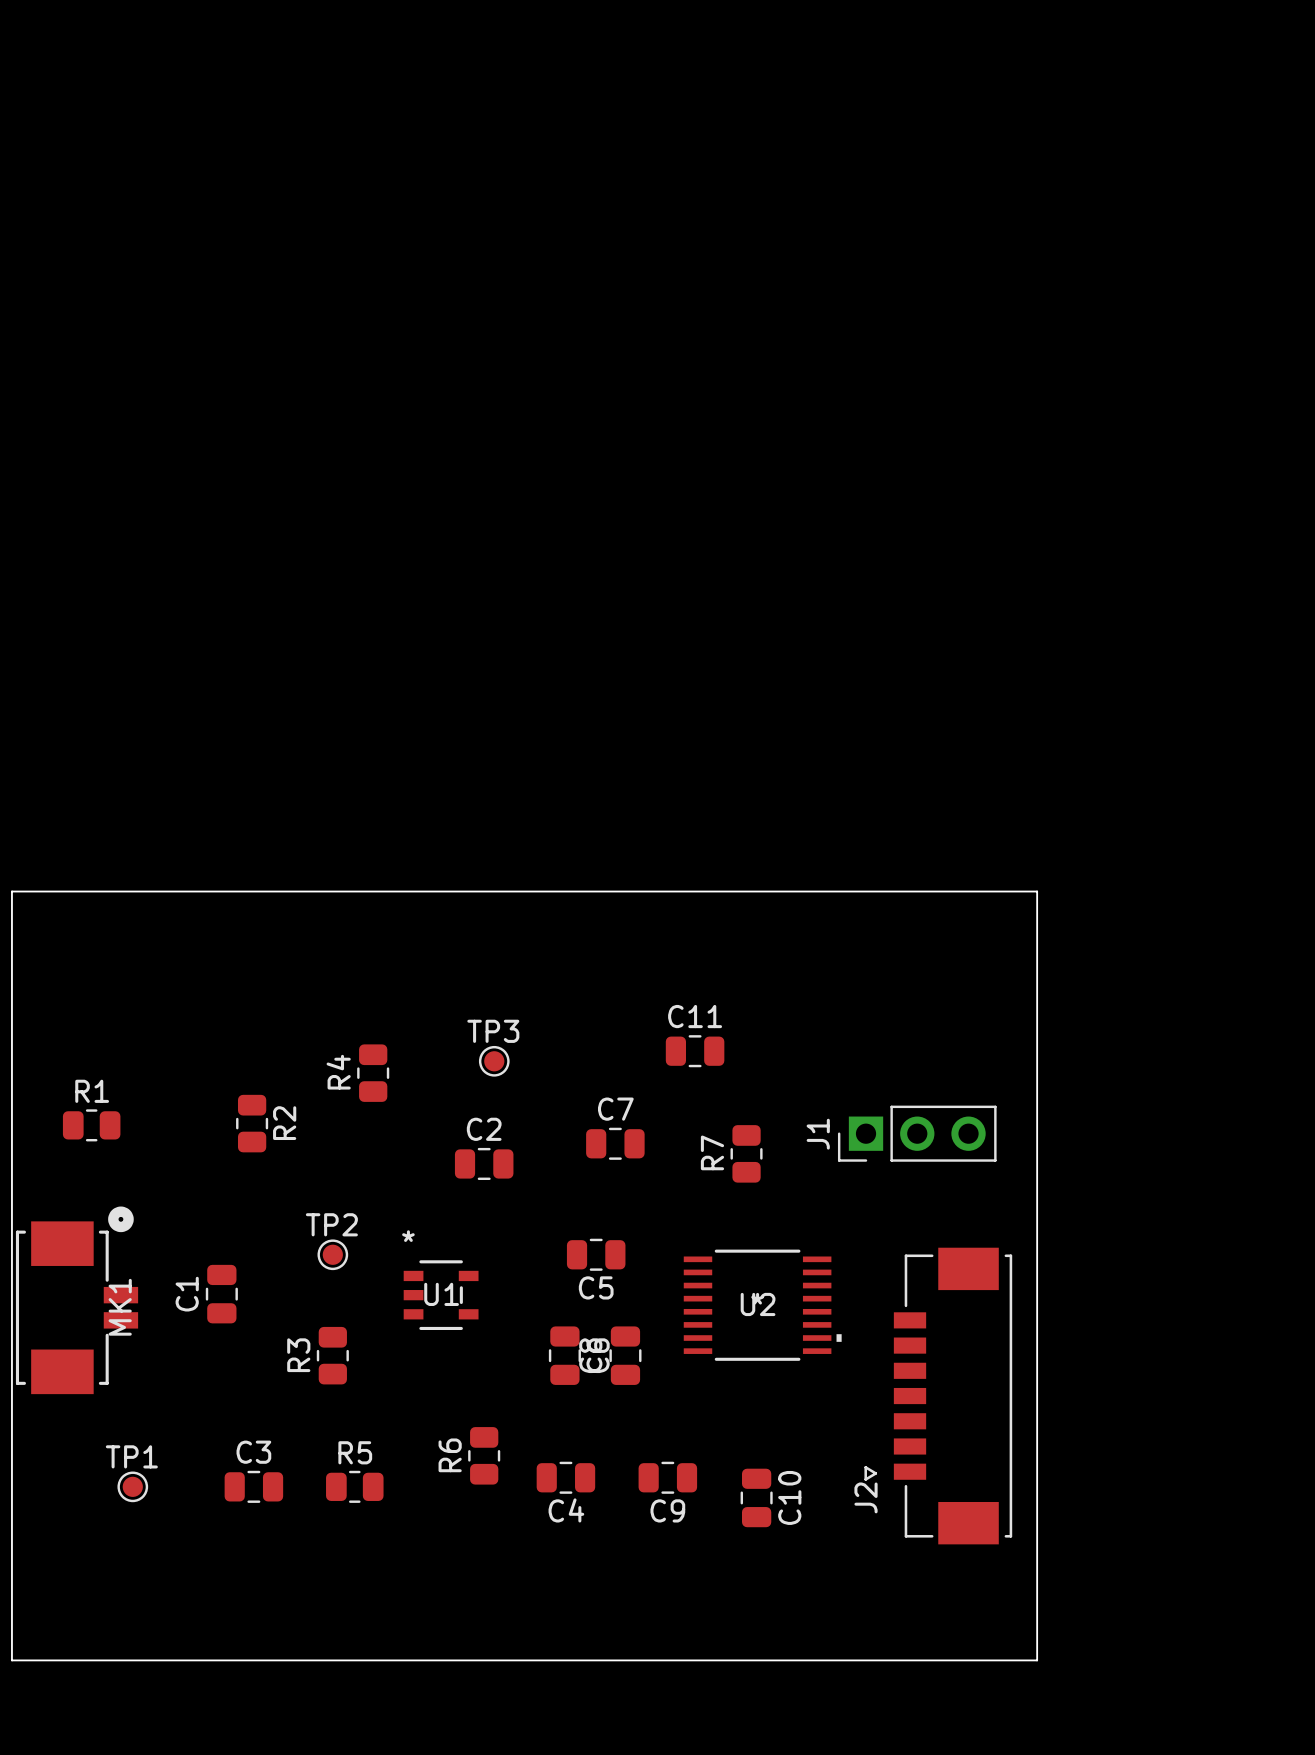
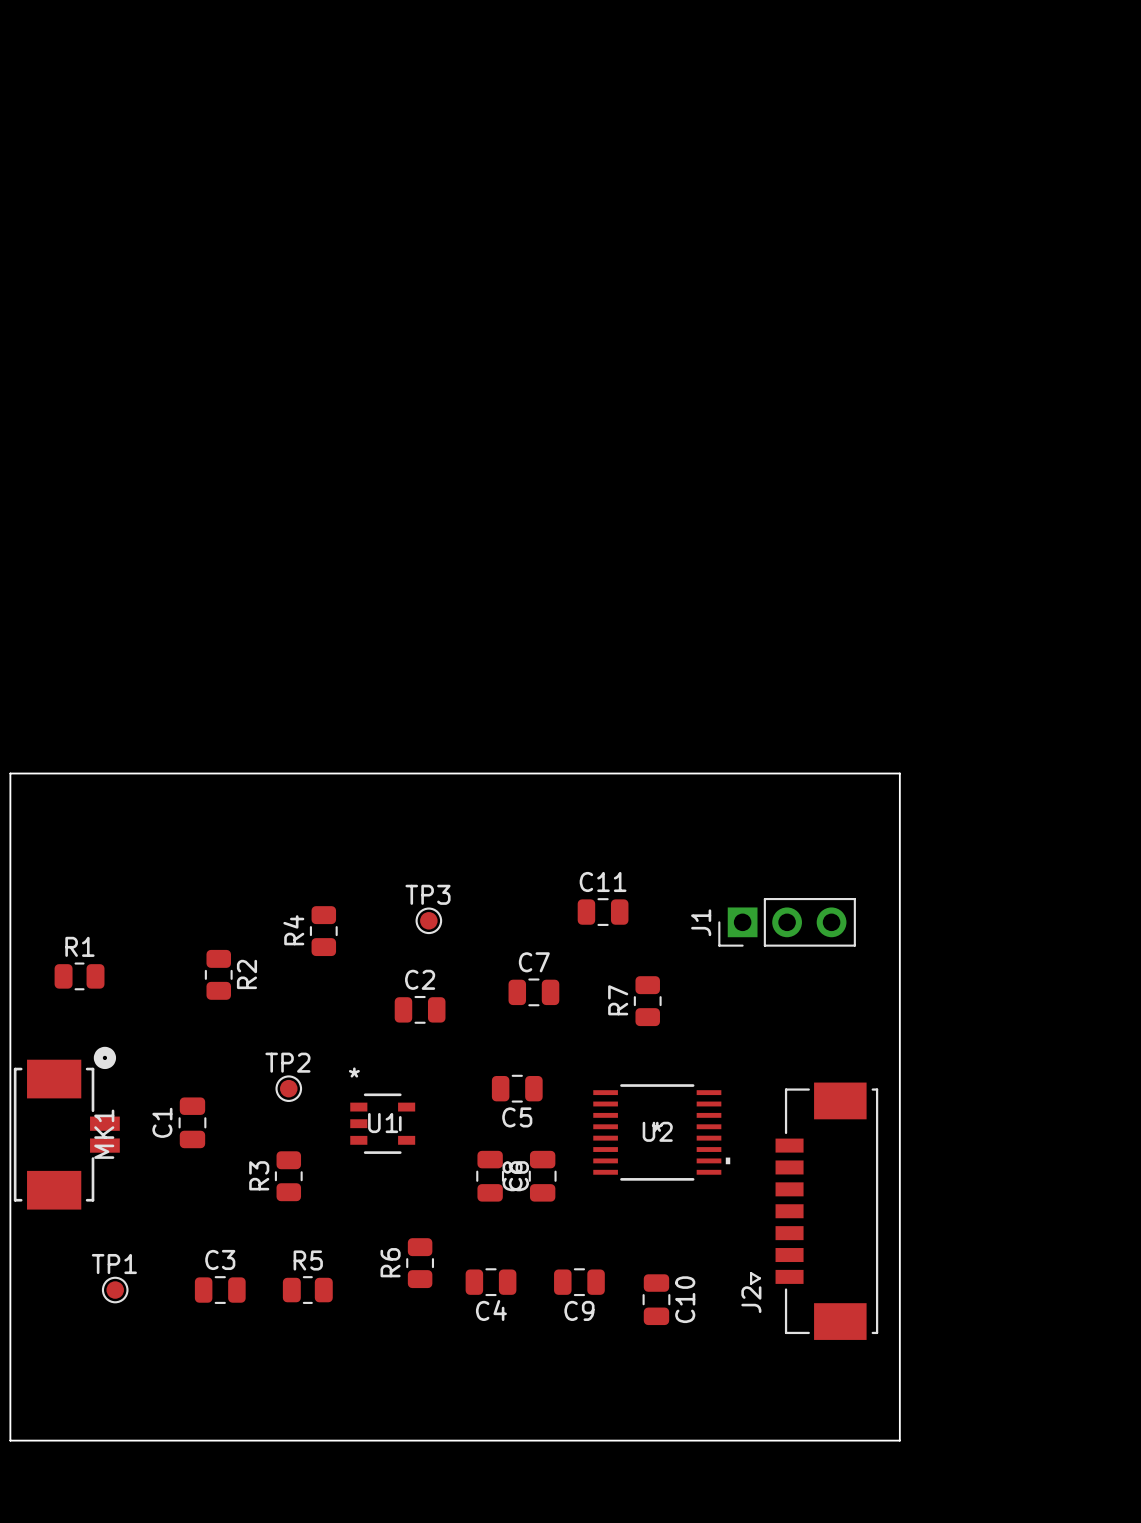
J1 position: (917, 1133) -> (787, 922)

